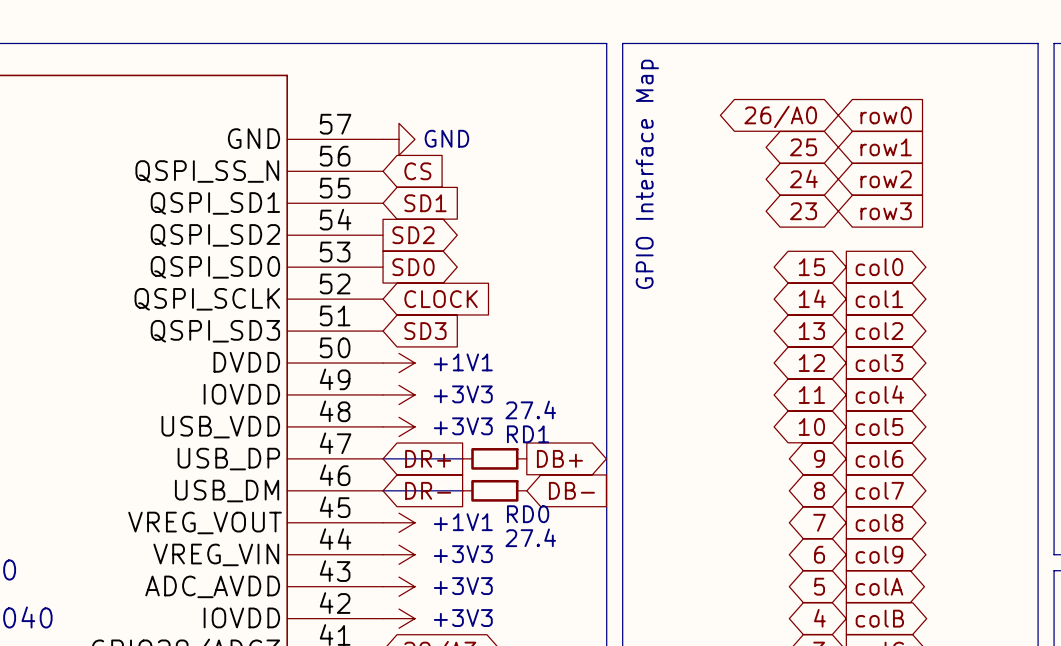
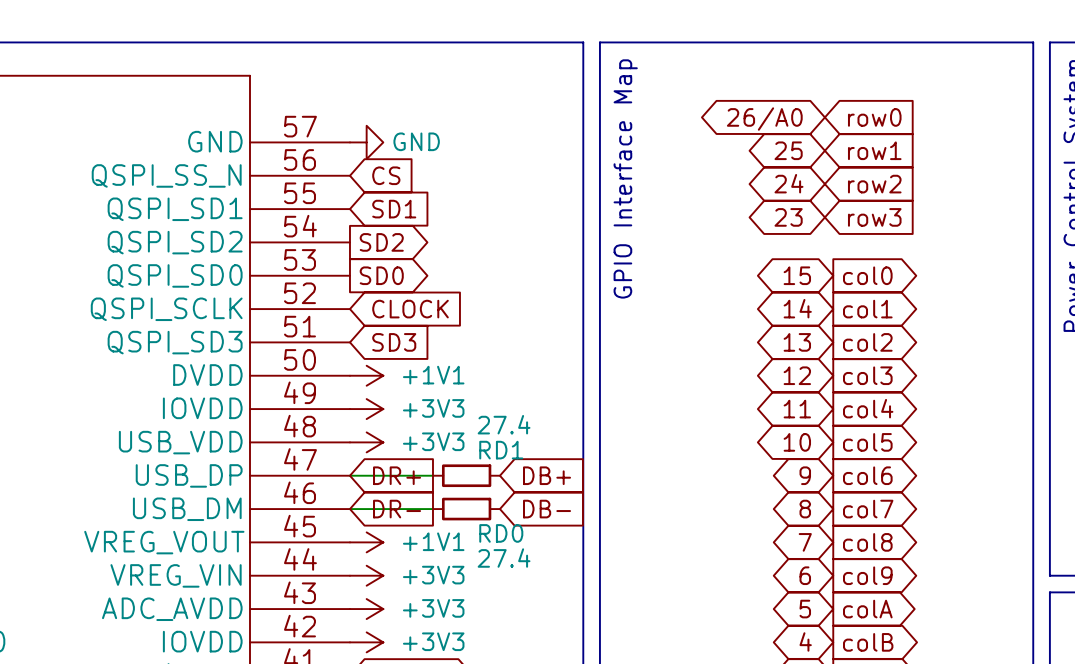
global label shape: output (559, 458) -> input (547, 475)

